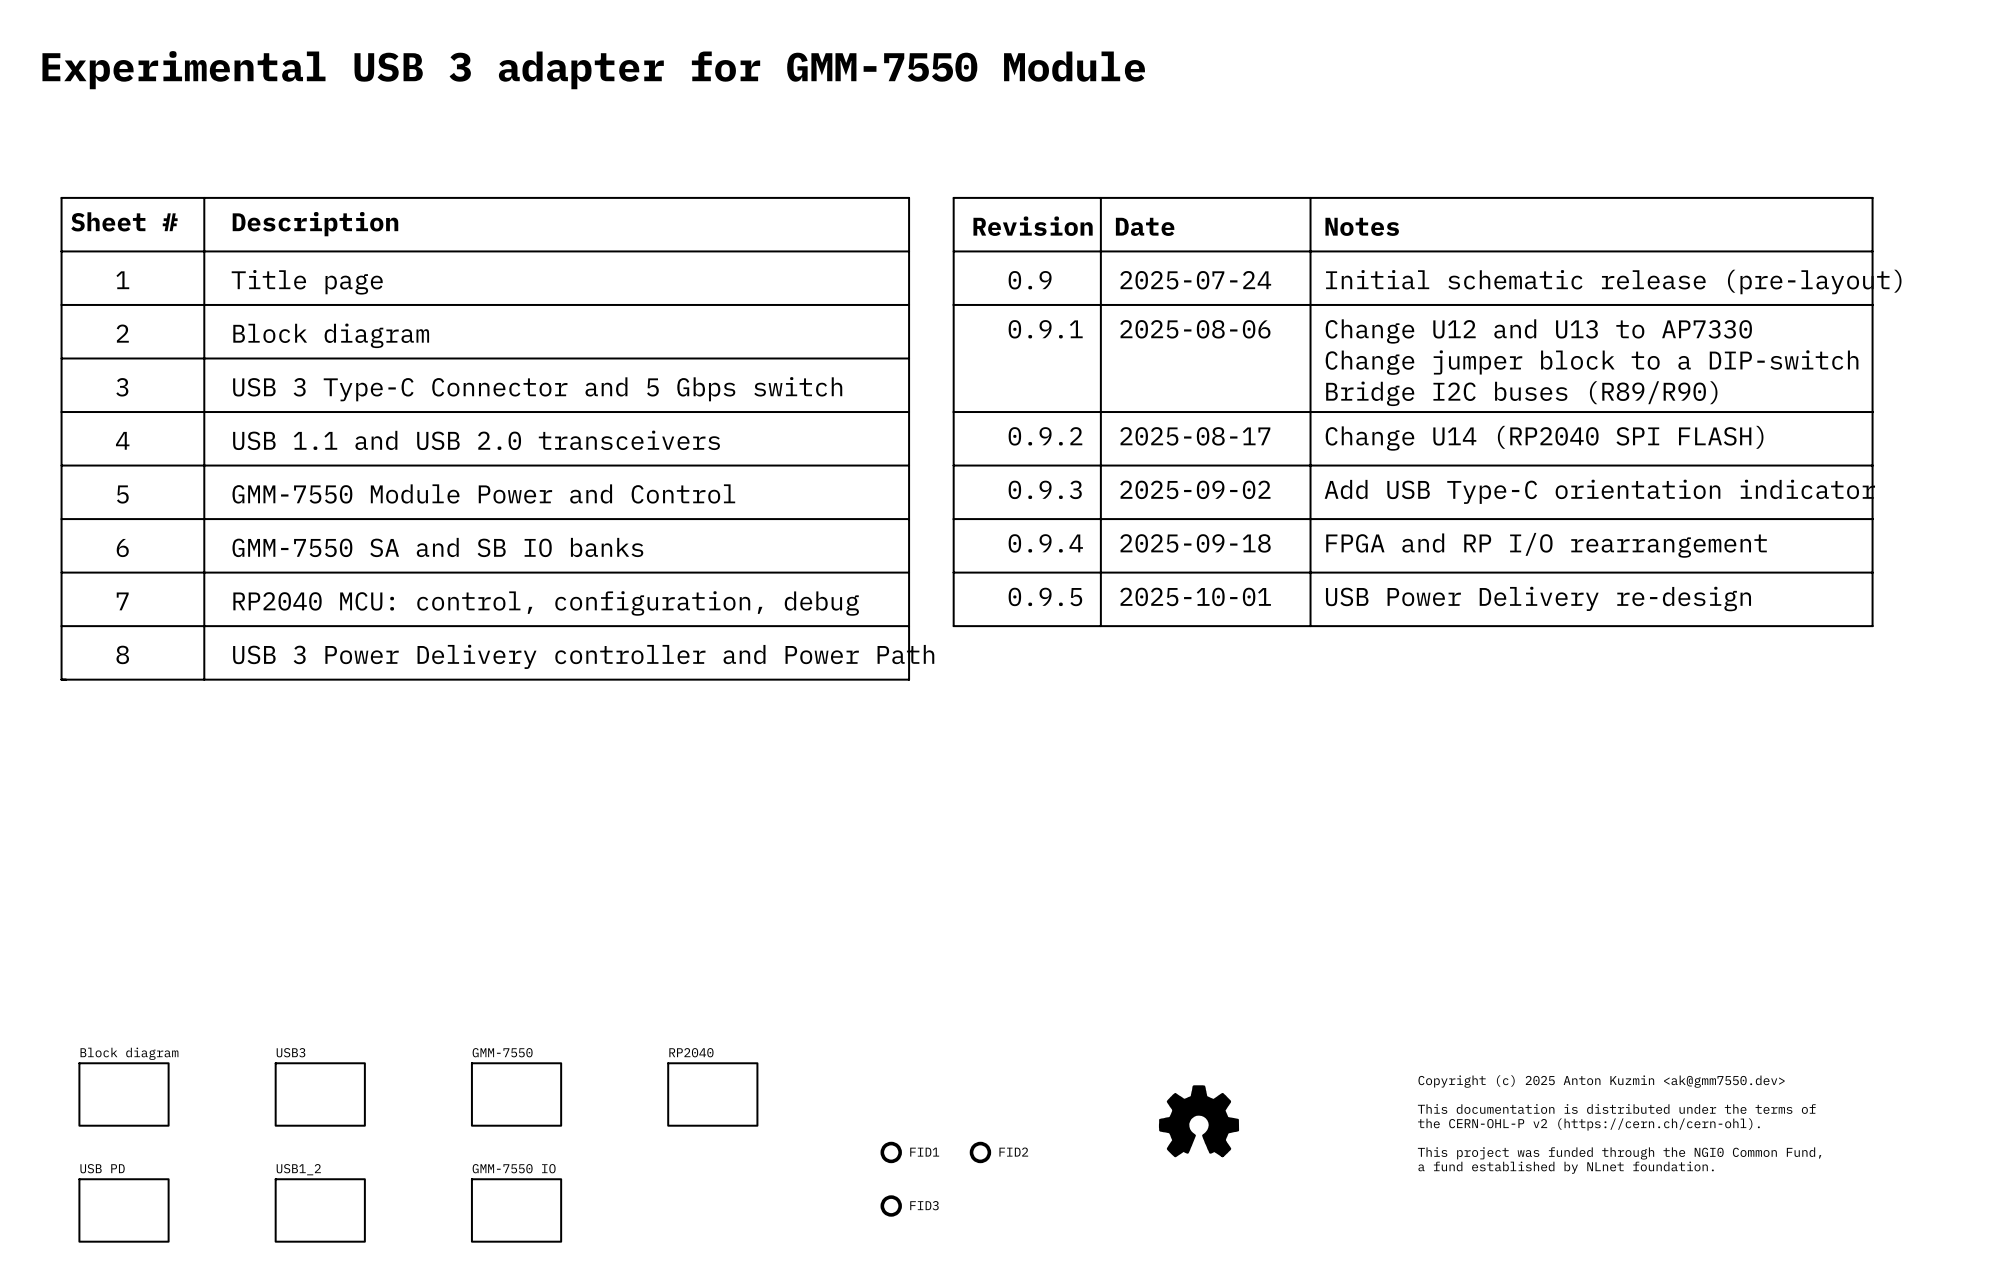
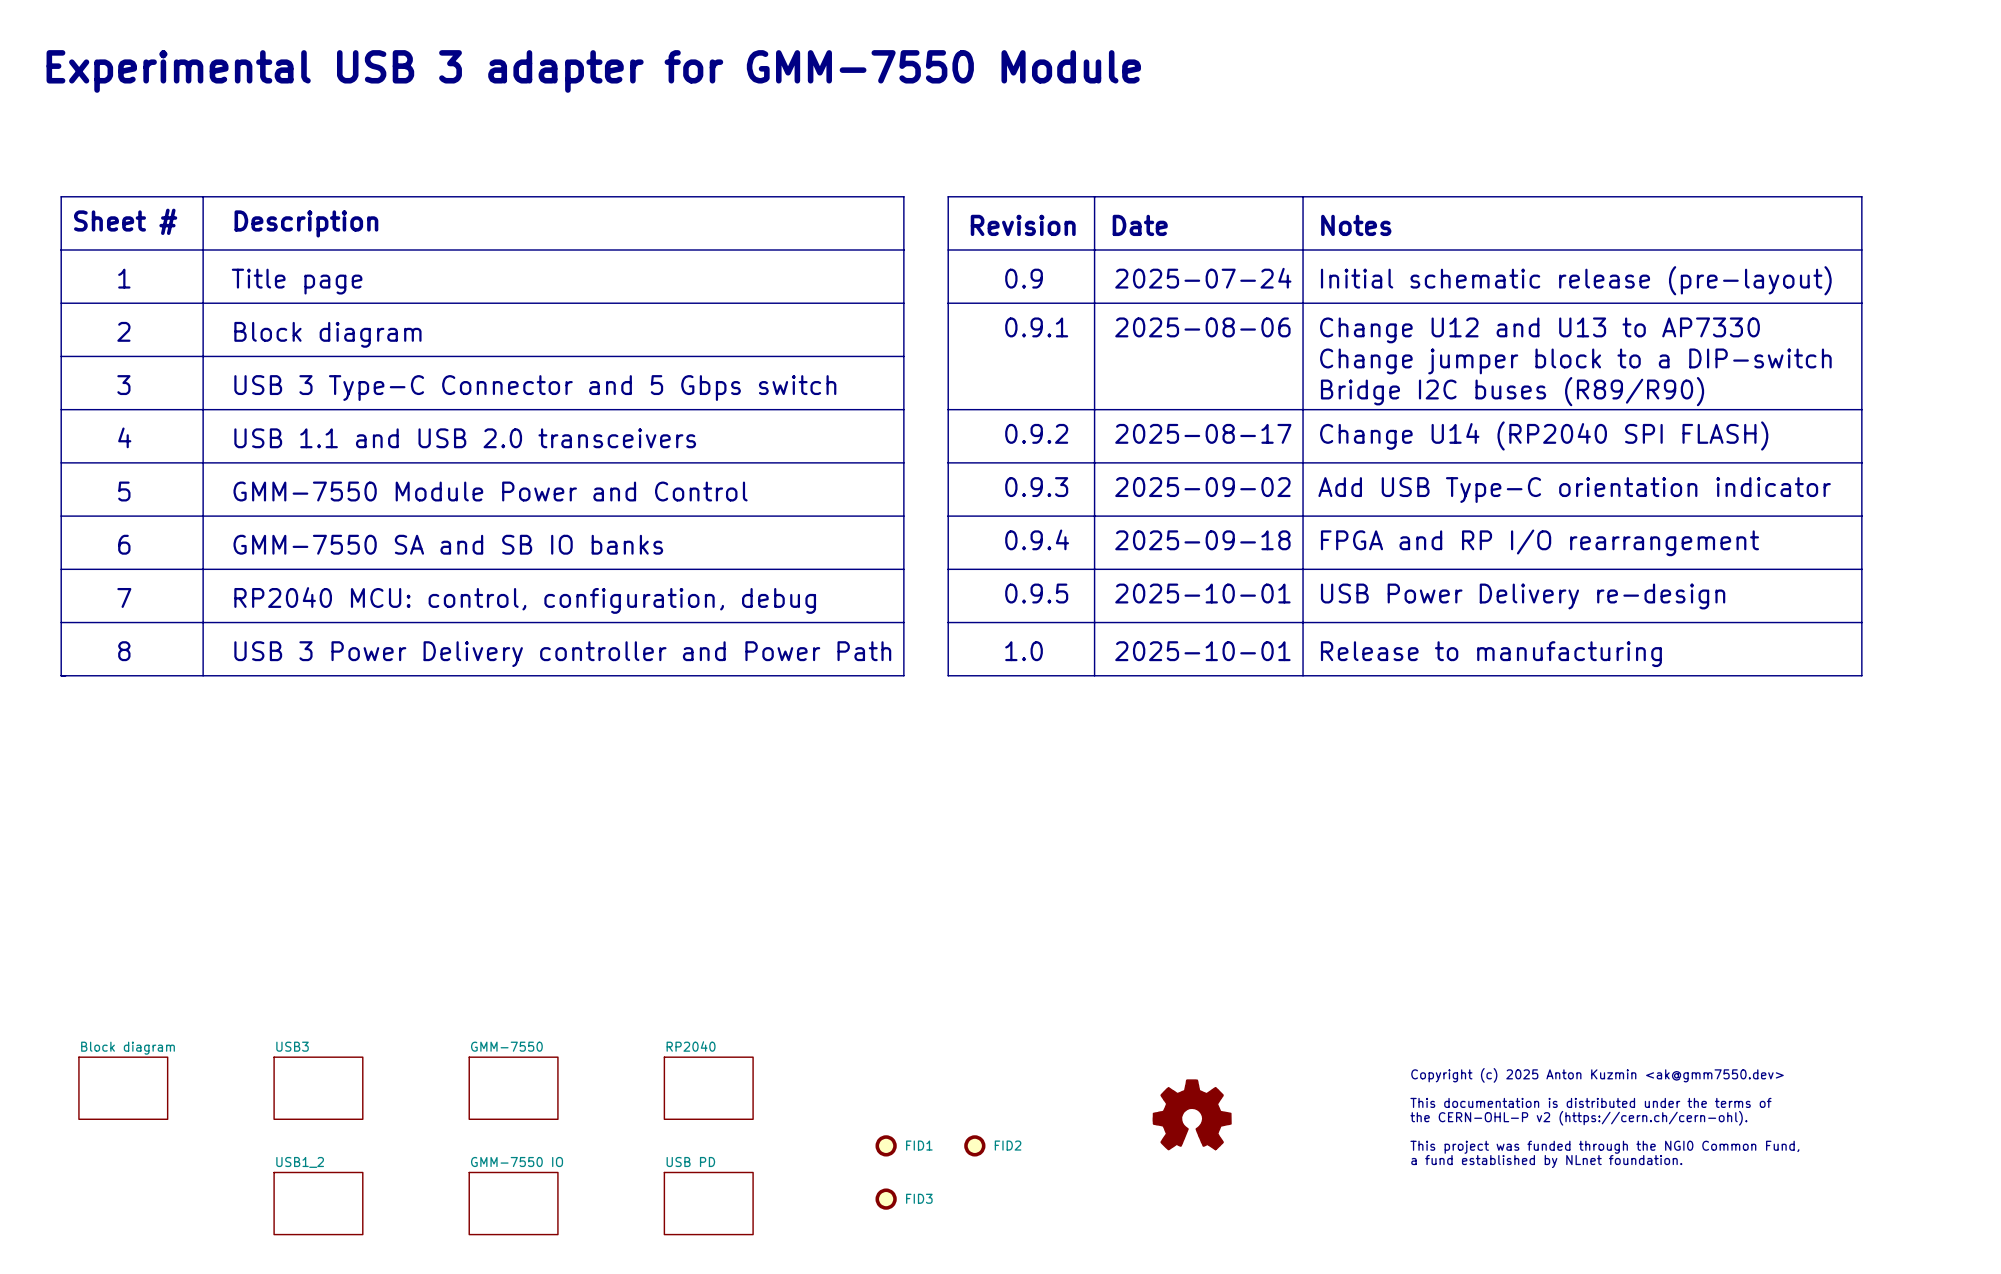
line: none -> (948, 622) (948, 675) (1861, 675) (1861, 622)
line: none -> (1094, 622) (1094, 675)
line: none -> (1303, 622) (1303, 675)
text: none -> 1.0 (1024, 651)
text: none -> 2025-10-01 (1202, 651)
text: none -> Release to manufacturing (1491, 654)
sheet USB PD: (124, 1210) -> none
sheet USB PD: none -> (708, 1203)

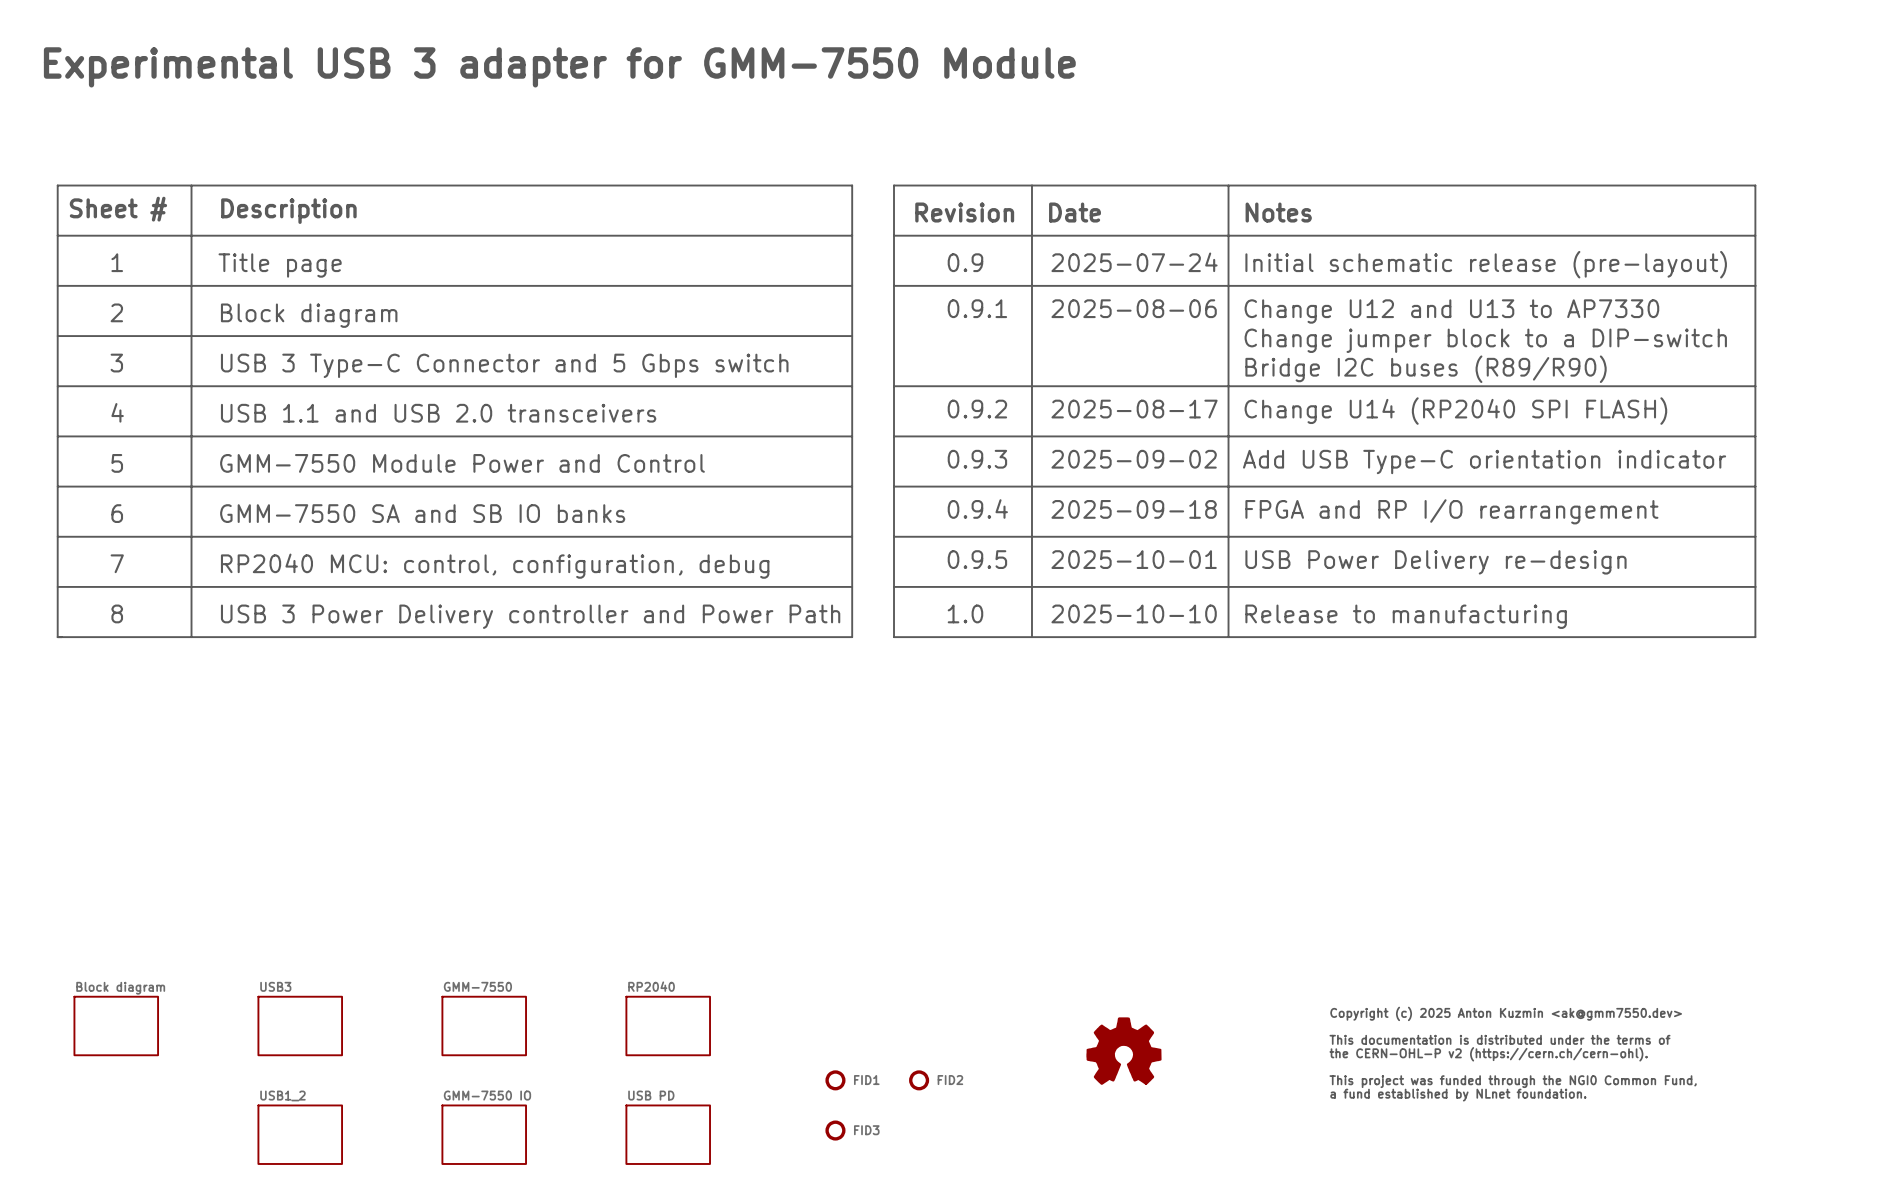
text: 2025-10-01 (1202, 651) -> 2025-10-10 (1134, 613)

